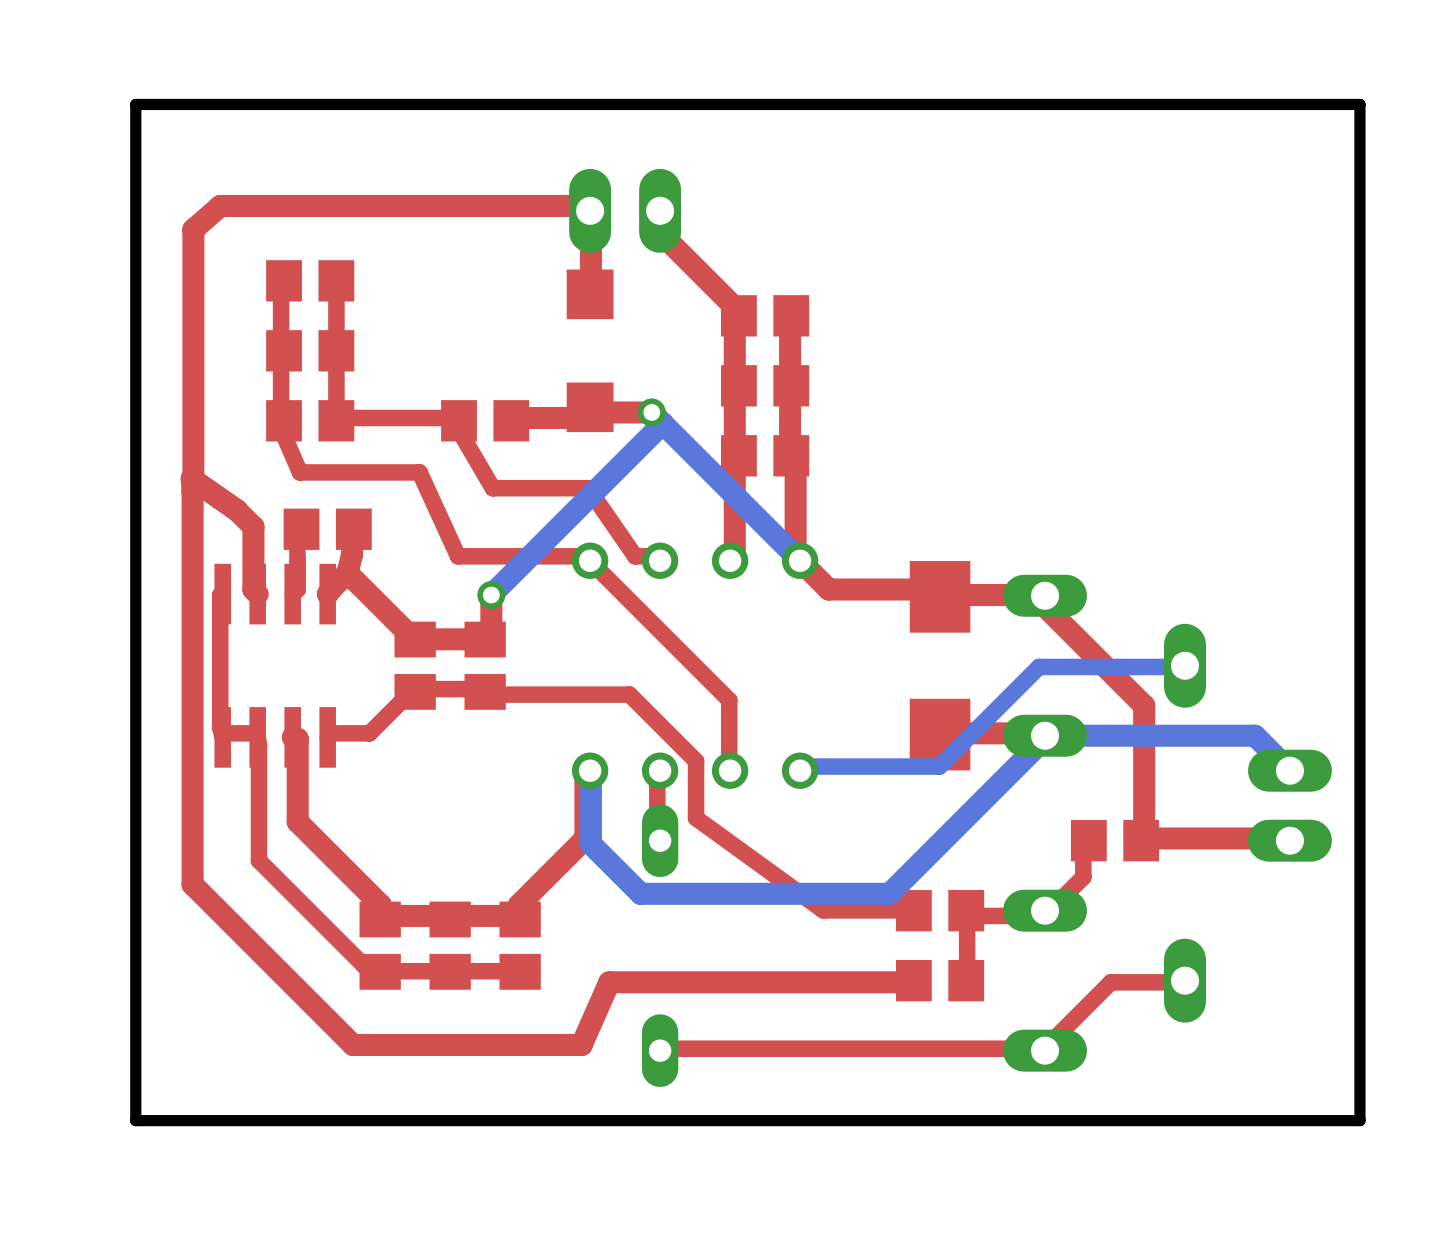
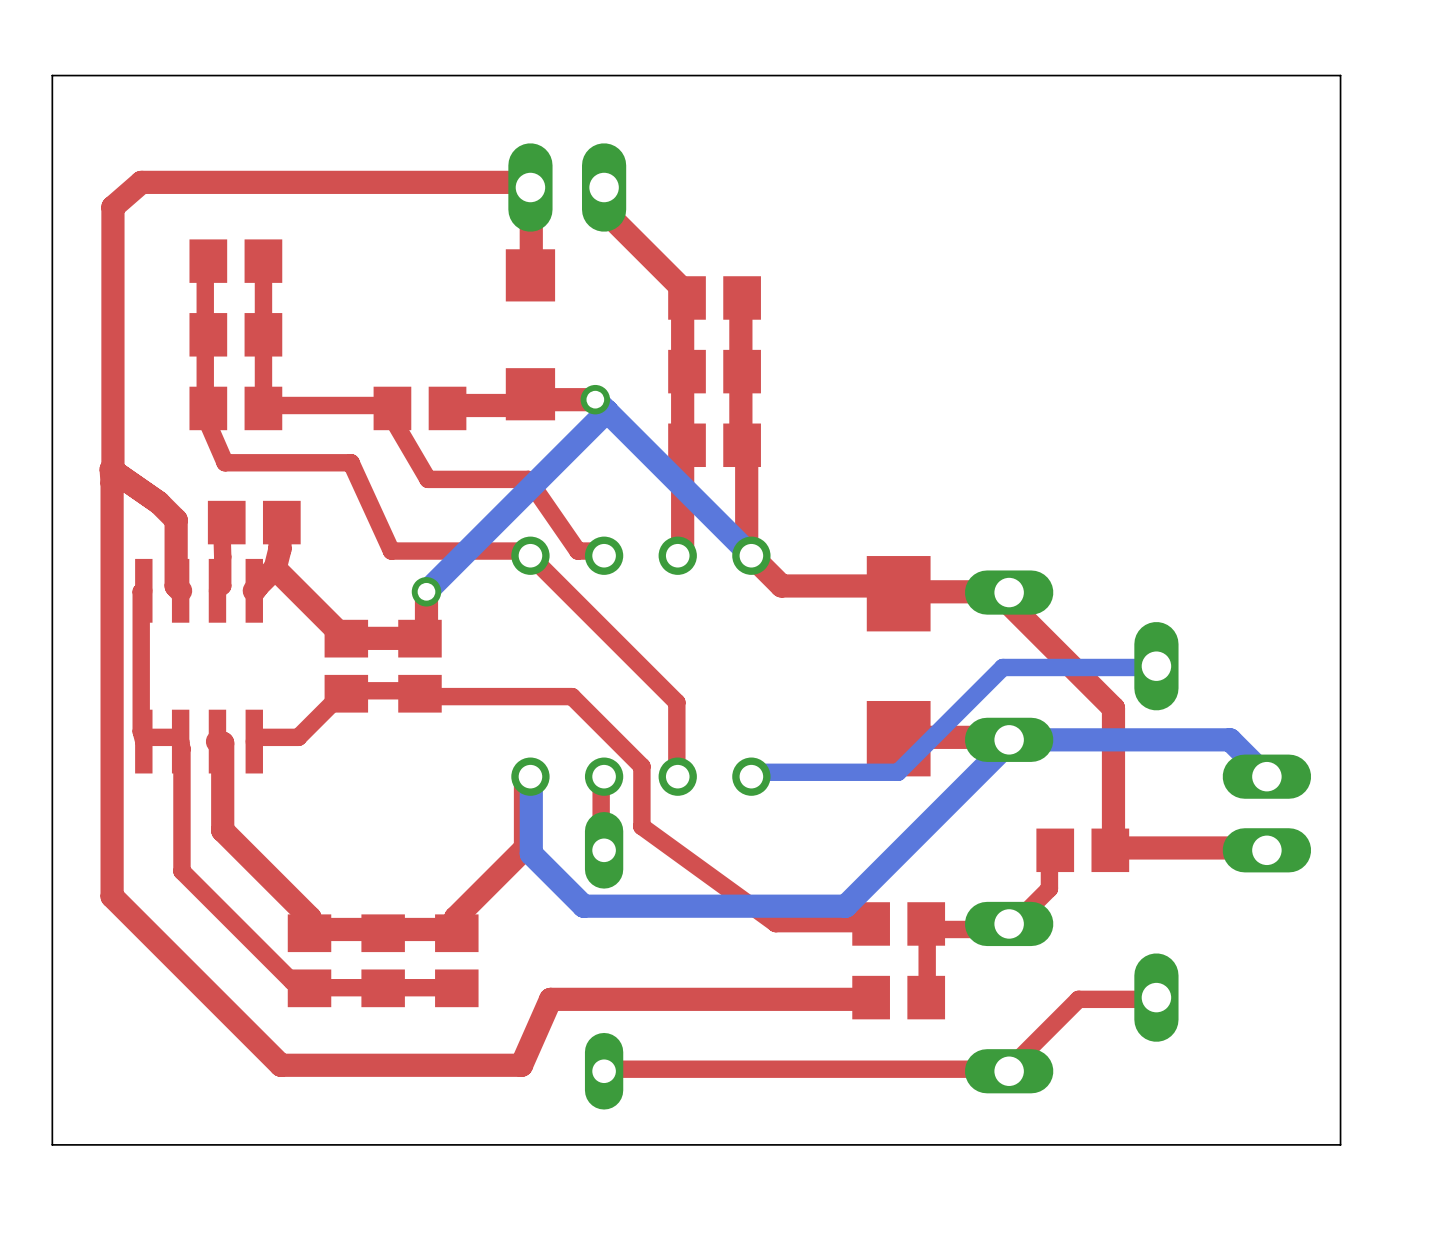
board edge width: thick (1359, 104) (135, 104) (135, 1120) (1359, 1120) (1359, 104) -> thin (1340, 75) (52, 75) (52, 1144) (1340, 1144) (1340, 75)

